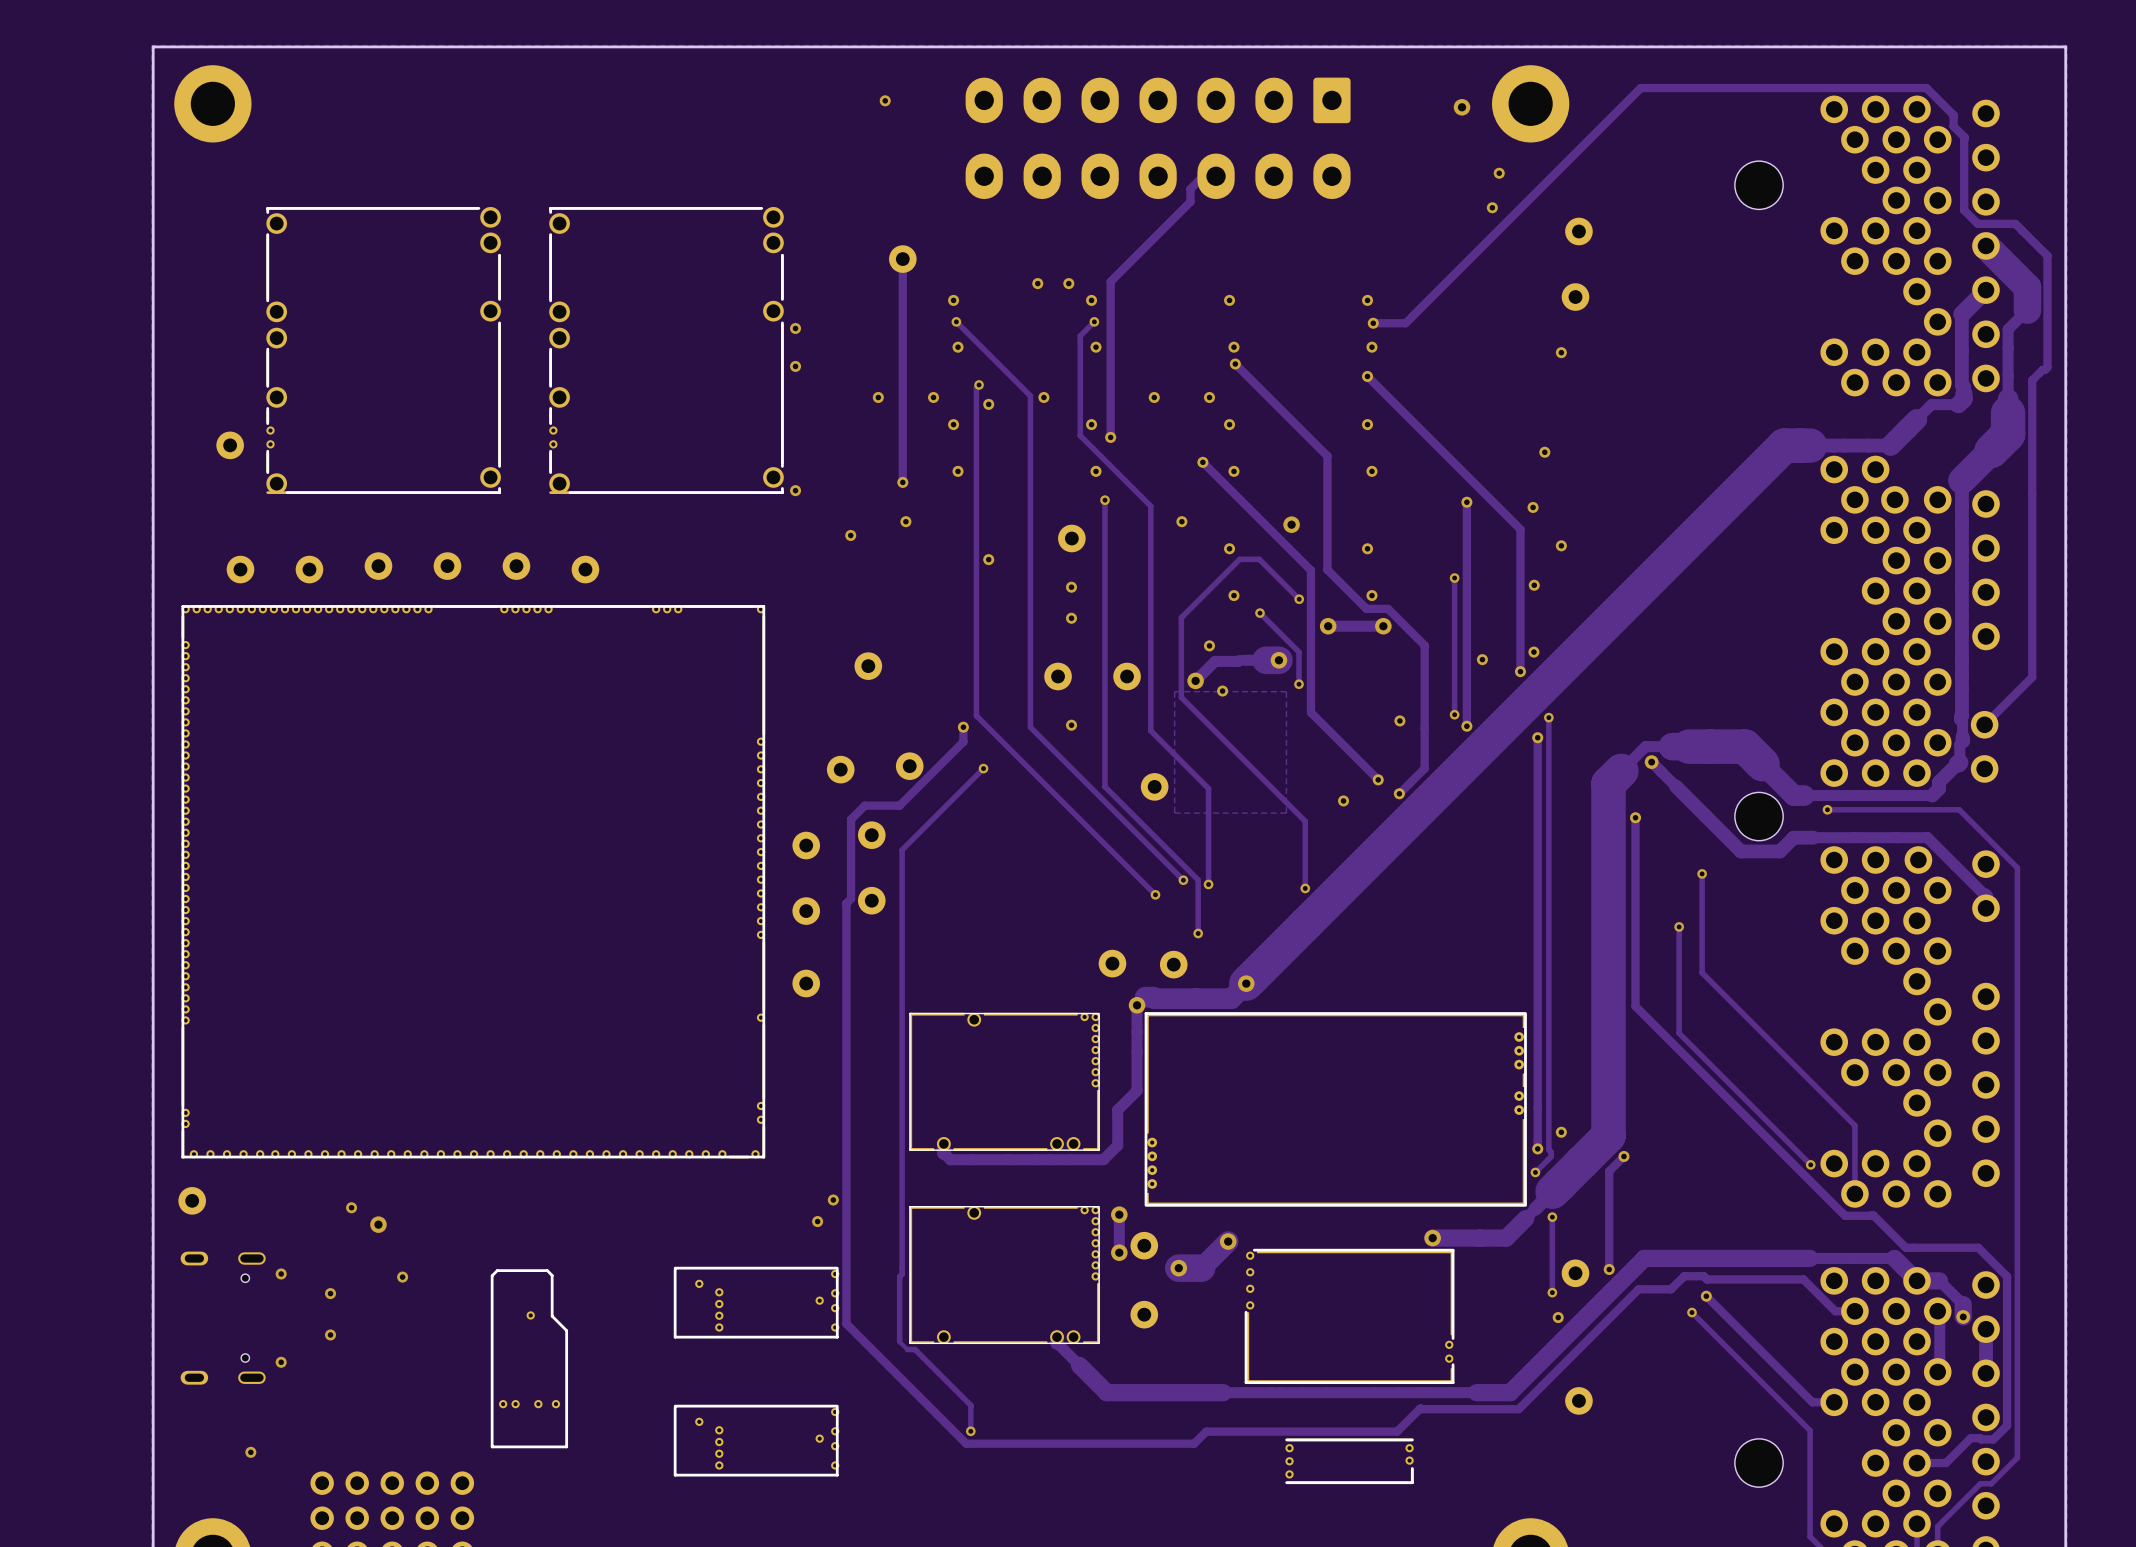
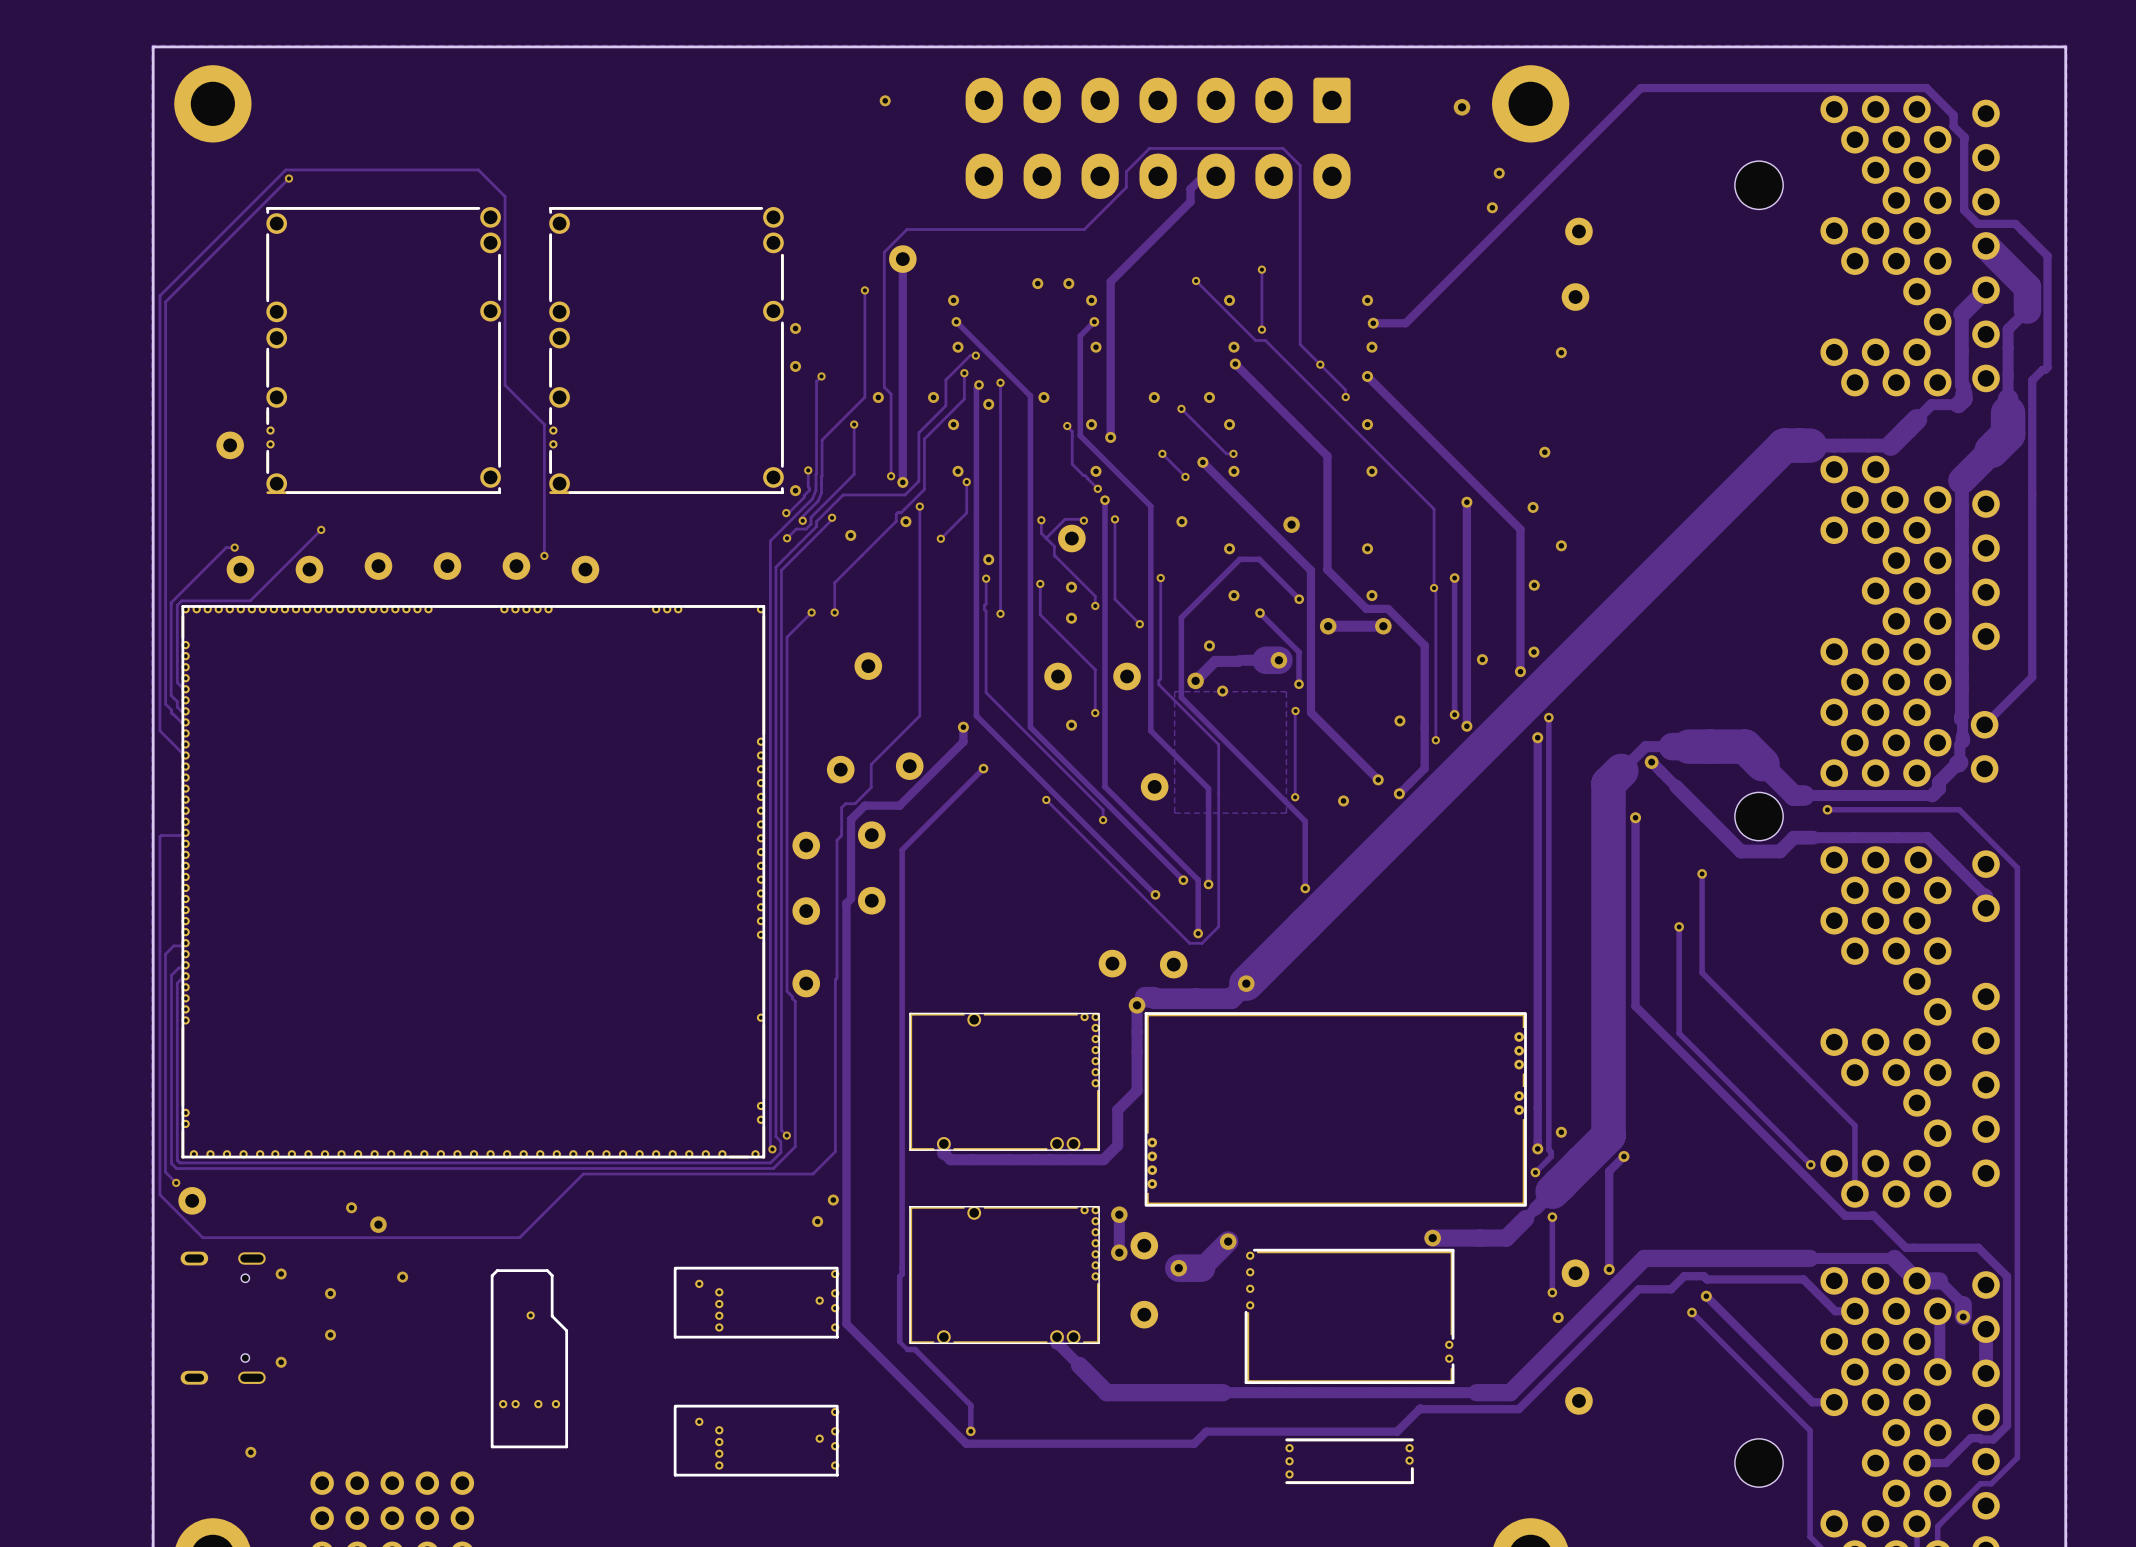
track: none -> (288, 178) (165, 301) (165, 704) (171, 710) (172, 714) (181, 722) (185, 722)
via: none -> (288, 178)
track: none -> (1261, 269) (1261, 329)
via: none -> (1261, 269)
track: none -> (1196, 280) (1255, 340) (1265, 340) (1434, 509) (1435, 740)
via: none -> (1196, 280)
track: none -> (864, 290) (864, 397) (822, 440) (821, 492) (818, 501) (802, 516) (802, 520)
via: none -> (864, 290)
via: none -> (1261, 329)
track: none -> (975, 355) (970, 355) (945, 379) (945, 405) (918, 432) (918, 481) (905, 494) (843, 494) (816, 521) (816, 526) (775, 567) (775, 1136) (780, 1141) (780, 1152) (770, 1162) (179, 1162) (177, 1160) (177, 983) (185, 976)
via: none -> (975, 355)
via: none -> (1320, 364)
track: none -> (964, 373) (964, 399) (924, 439) (924, 489) (901, 512) (896, 514) (896, 521) (834, 582) (834, 612)
via: none -> (964, 373)
track: none -> (821, 376) (816, 381) (815, 490) (812, 498) (770, 540) (770, 1147) (772, 1149)
via: none -> (821, 376)
track: none -> (1000, 382) (1000, 613)
via: none -> (1000, 382)
track: none -> (1345, 397) (1345, 390) (1300, 344) (1300, 165) (1283, 148) (1149, 148) (1126, 171) (1126, 187) (1084, 229) (906, 229) (884, 252) (884, 387) (891, 394) (891, 476)
via: none -> (1345, 397)
track: none -> (1181, 408) (1226, 453) (1233, 453)
via: none -> (1181, 408)
track: none -> (854, 424) (854, 474) (811, 517) (811, 524) (806, 529) (796, 529) (787, 538)
via: none -> (854, 424)
track: none -> (1067, 426) (1072, 431) (1072, 464) (1097, 488)
via: none -> (1067, 426)
track: none -> (1162, 453) (1185, 476)
via: none -> (1162, 453)
via: none -> (1233, 453)
track: none -> (808, 470) (809, 490) (788, 513) (786, 513)
via: none -> (808, 470)
via: none -> (891, 476)
via: none -> (1185, 476)
track: none -> (966, 481) (966, 512) (940, 538)
via: none -> (966, 481)
via: none -> (1097, 488)
track: none -> (919, 506) (919, 715) (871, 764) (871, 787) (855, 803) (845, 803) (841, 807) (841, 835) (837, 840) (835, 1151) (812, 1174) (583, 1174) (519, 1237) (202, 1237) (159, 1194) (159, 836) (182, 835) (185, 832)
via: none -> (919, 506)
via: none -> (786, 513)
track: none -> (832, 517) (781, 570) (781, 1130) (786, 1135)
via: none -> (832, 517)
track: none -> (1114, 519) (1114, 599) (1139, 624)
via: none -> (1114, 519)
via: none -> (802, 520)
track: none -> (1041, 520) (1041, 533) (1054, 546) (1054, 555) (1095, 596) (1095, 605)
via: none -> (1041, 520)
track: none -> (1083, 520) (1065, 519) (1046, 538)
via: none -> (1083, 520)
track: none -> (321, 529) (250, 600) (181, 600) (177, 605) (177, 682) (185, 689)
via: none -> (321, 529)
via: none -> (787, 538)
via: none -> (940, 538)
track: none -> (234, 547) (226, 547) (171, 602) (171, 695) (177, 701) (177, 707) (181, 711) (185, 711)
via: none -> (234, 547)
track: none -> (544, 555) (544, 424) (505, 385) (505, 196) (478, 169) (285, 169) (159, 295) (159, 730) (185, 755)
via: none -> (544, 555)
track: none -> (986, 578) (986, 603) (984, 605) (986, 611) (986, 692) (1103, 809) (1103, 820)
via: none -> (986, 578)
track: none -> (1160, 578) (1160, 678) (1158, 684) (1218, 744) (1218, 926) (1202, 943) (1189, 943) (1046, 799)
via: none -> (1160, 578)
track: none -> (1040, 583) (1040, 614) (1095, 669) (1095, 713)
via: none -> (1040, 583)
via: none -> (1434, 588)
via: none -> (1095, 605)
track: none -> (811, 612) (787, 637) (787, 991) (795, 1001) (795, 1146) (773, 1168) (176, 1168) (171, 1163) (171, 975) (178, 967) (182, 967) (185, 965)
via: none -> (811, 612)
via: none -> (834, 612)
via: none -> (1000, 613)
via: none -> (1139, 624)
track: none -> (1295, 710) (1295, 797)
via: none -> (1295, 710)
via: none -> (1095, 713)
via: none -> (1435, 740)
via: none -> (1295, 797)
via: none -> (1046, 799)
via: none -> (1103, 820)
track: none -> (185, 943) (182, 945) (173, 945) (165, 954) (165, 1172) (176, 1182)
via: none -> (786, 1135)
via: none -> (772, 1149)
via: none -> (176, 1182)

